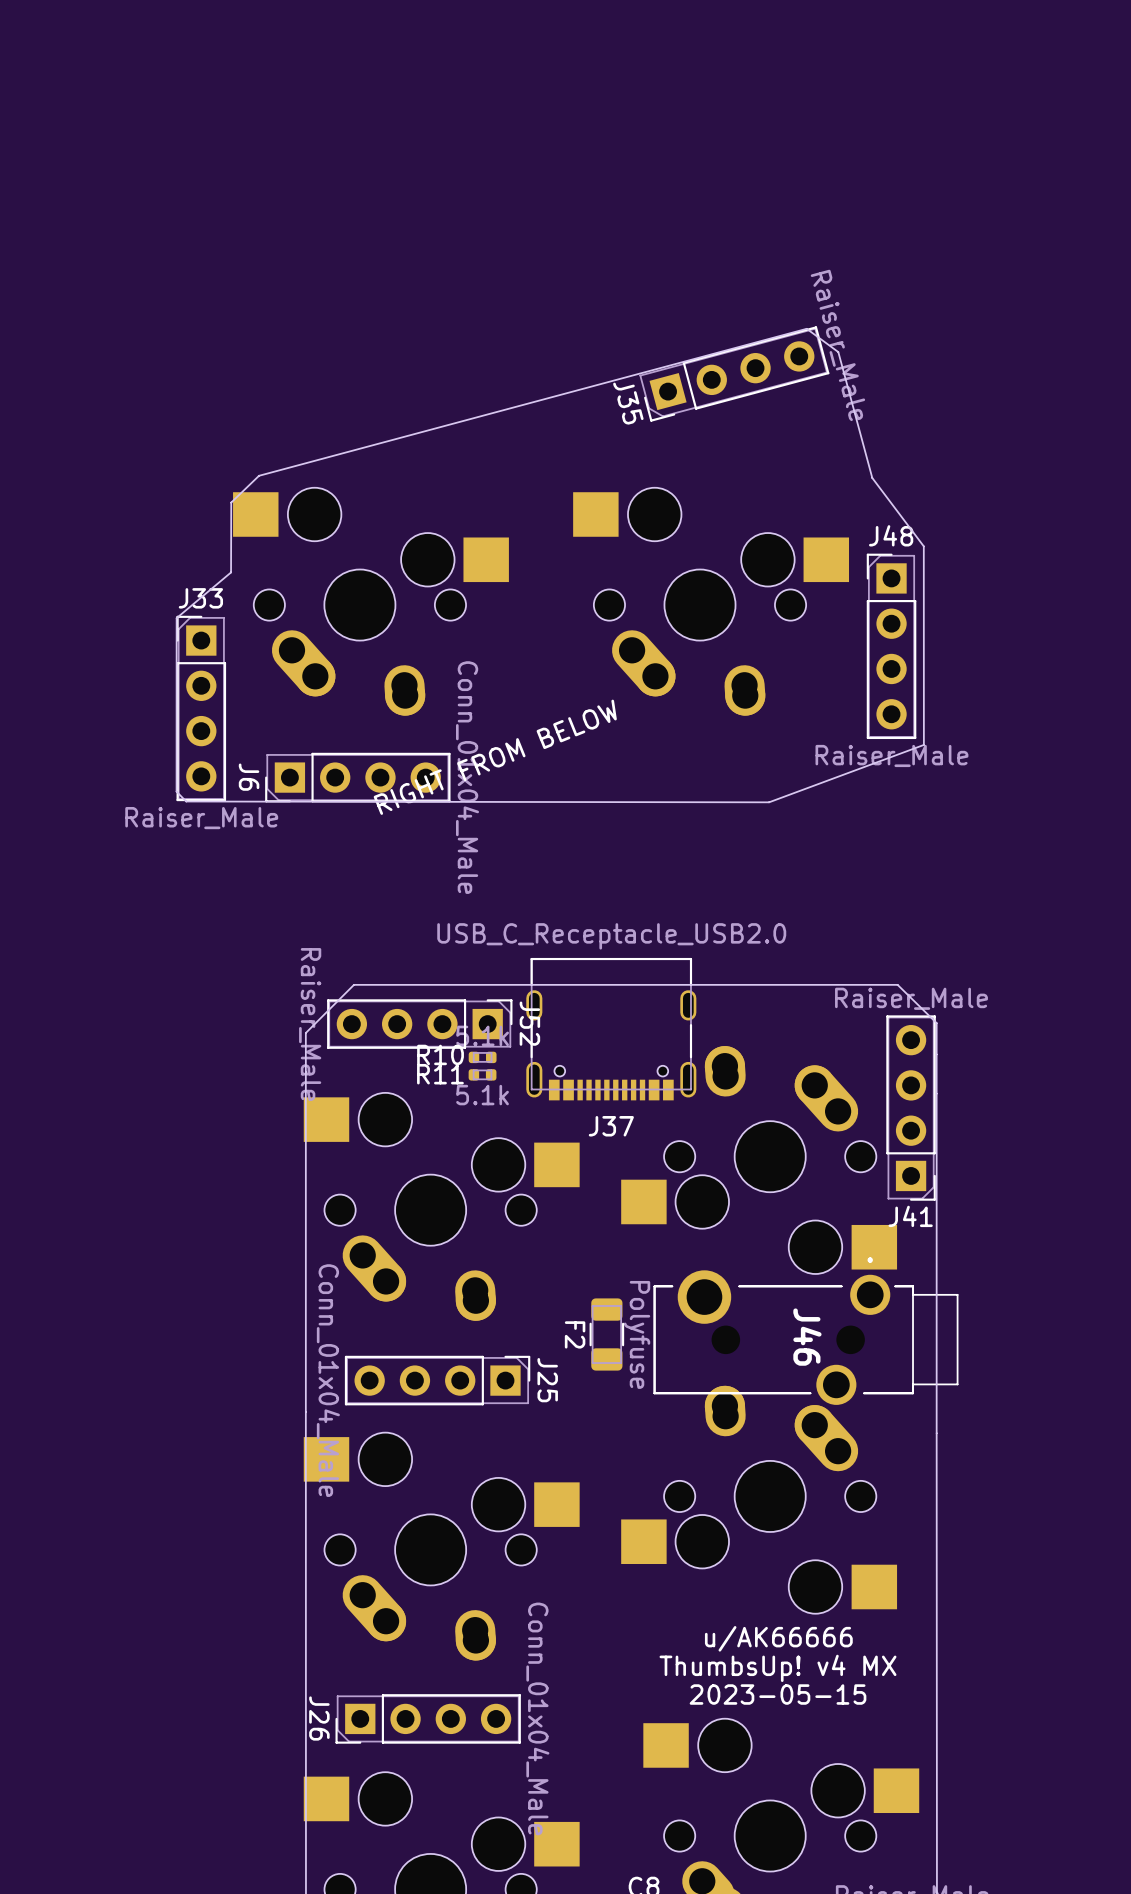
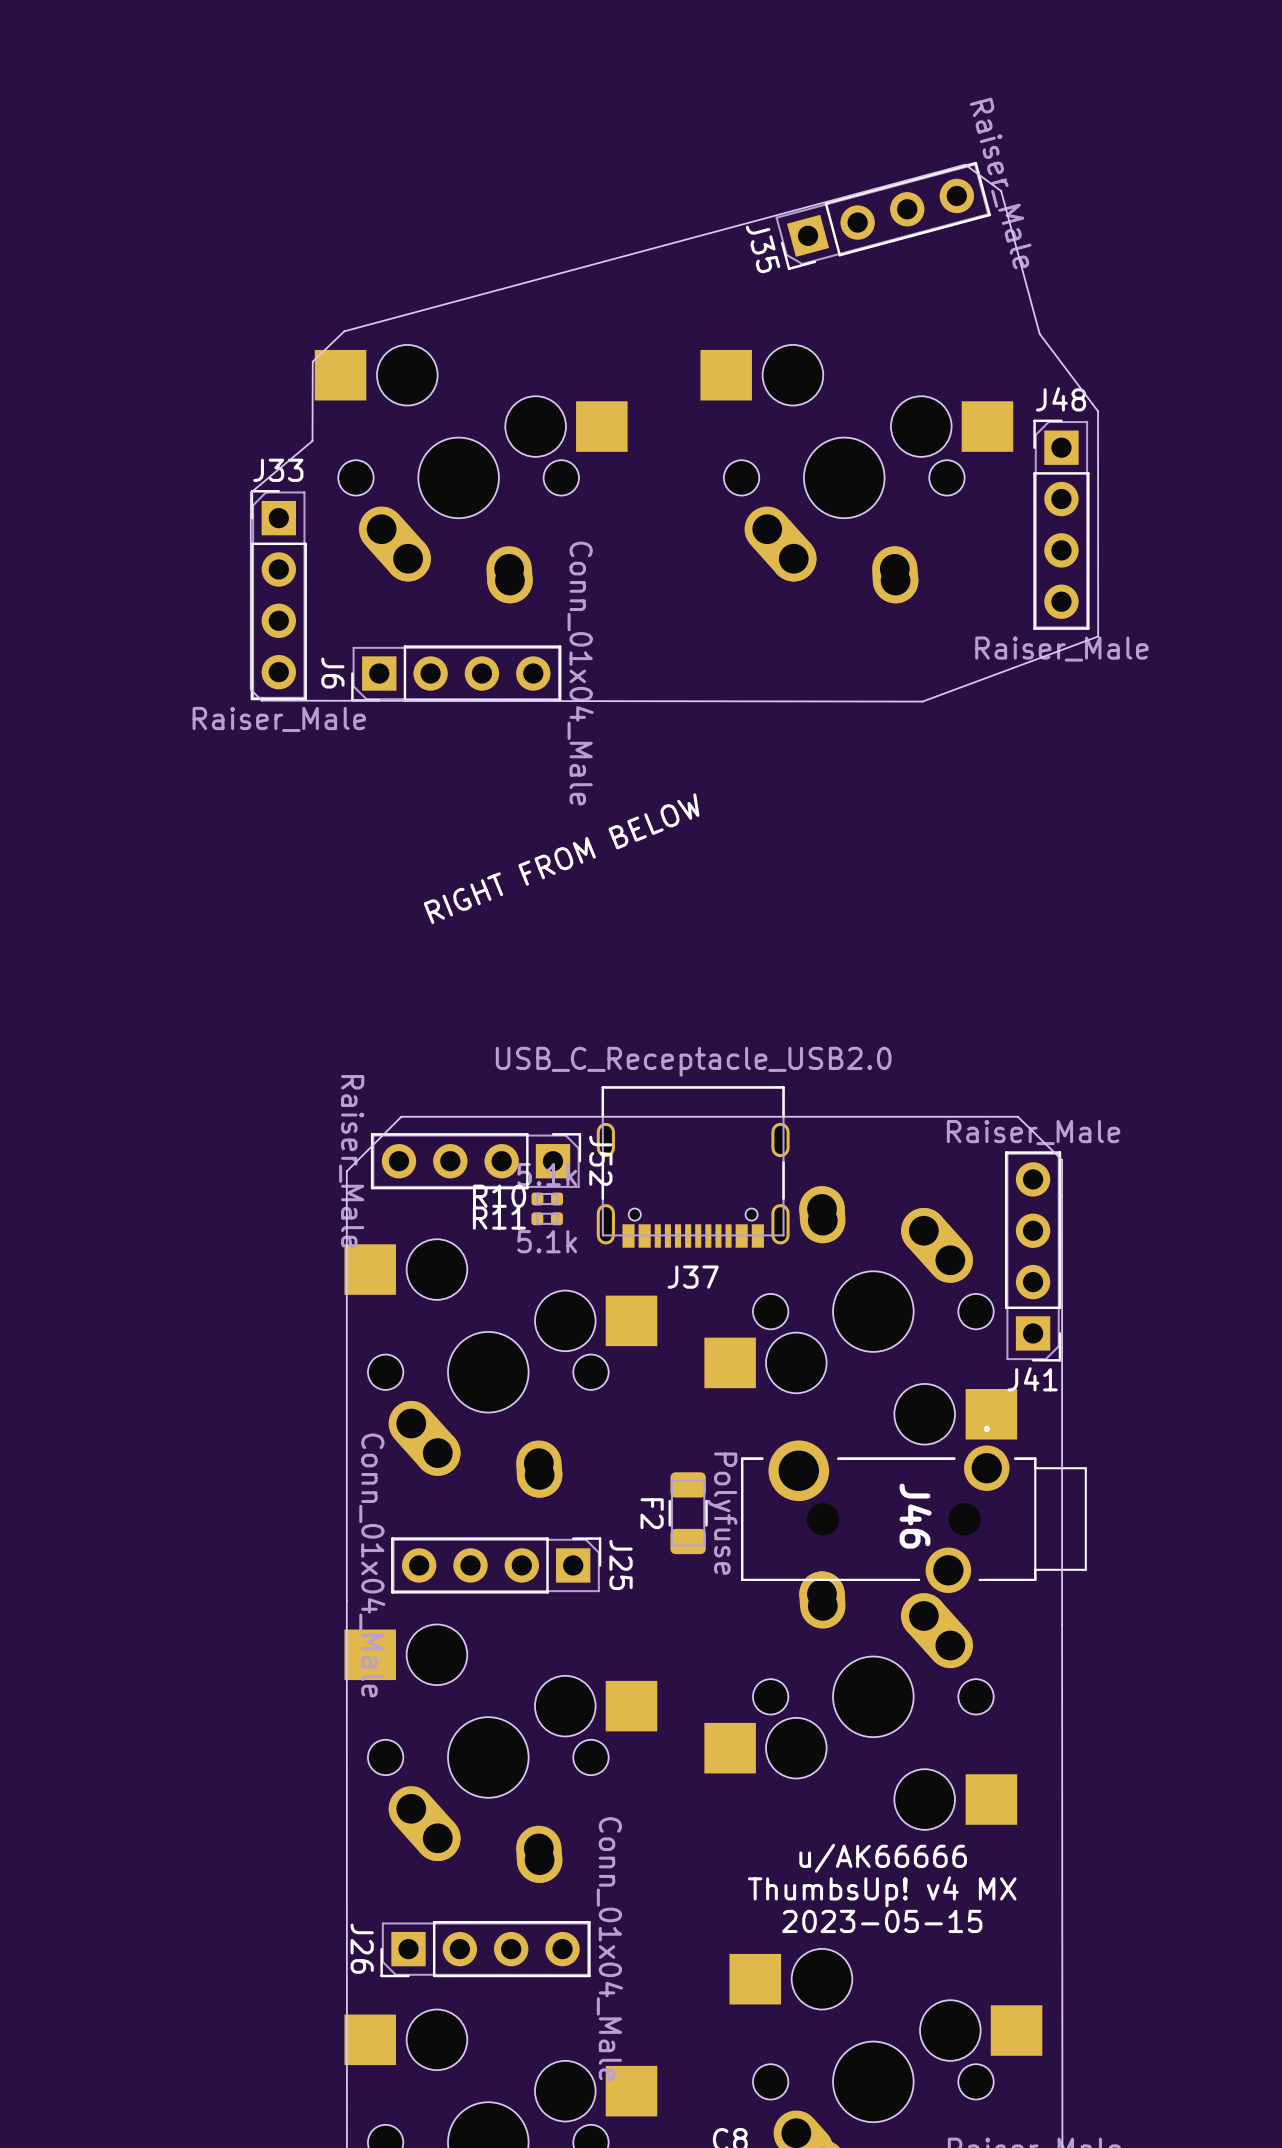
board edge: (806, 328) (259, 475) (231, 502) (231, 572) (176, 618) (176, 791) (186, 801) (769, 802) (923, 744) (923, 546) (872, 478) (838, 352) (806, 328) -> (965, 164) (344, 331) (312, 361) (312, 440) (250, 492) (250, 689) (261, 700) (922, 701) (1098, 636) (1098, 411) (1039, 333) (1001, 191) (965, 164)
J35 position: (734, 374) -> (883, 215)
part: none -> (471, 474)
part: none -> (856, 474)
part: (370, 601) -> none
part: (711, 601) -> none
J48 position: (891, 646) -> (1061, 524)
J33 position: (201, 708) -> (278, 595)
J6 position: (357, 777) -> (456, 673)

